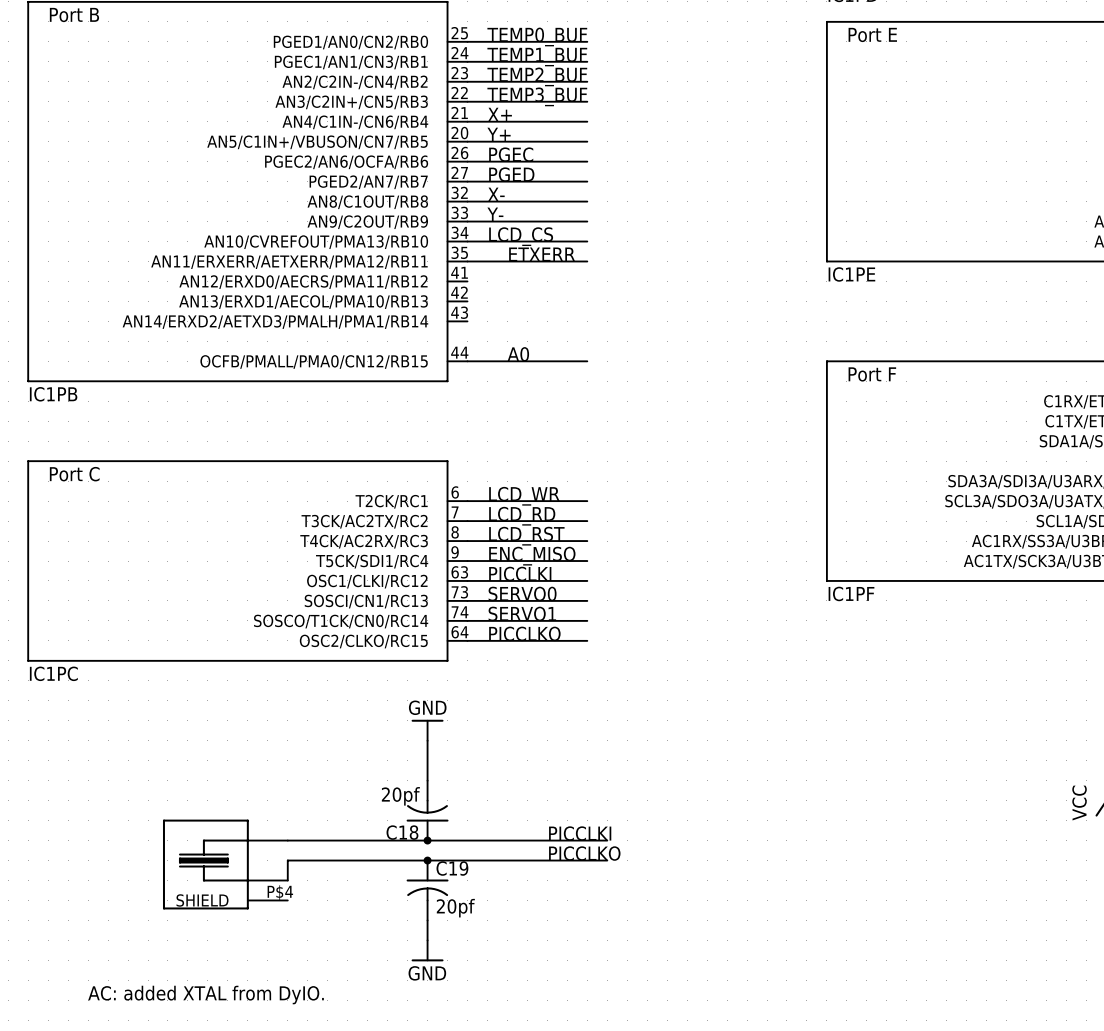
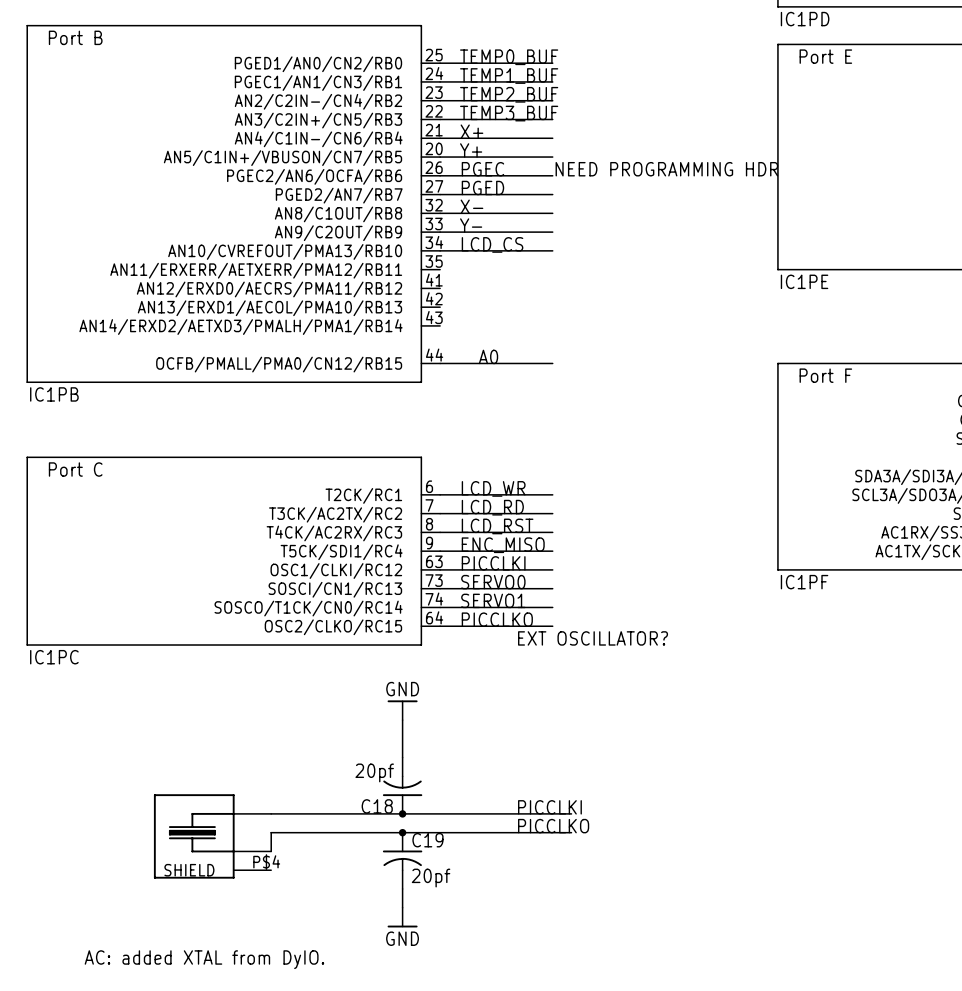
text: none -> NEED PROGRAMMING HDR (666, 169)
label: ETXERR (542, 254) -> none
wire: (467, 261) (587, 261) -> none
text: none -> EXT OSCILLATOR? (593, 638)

